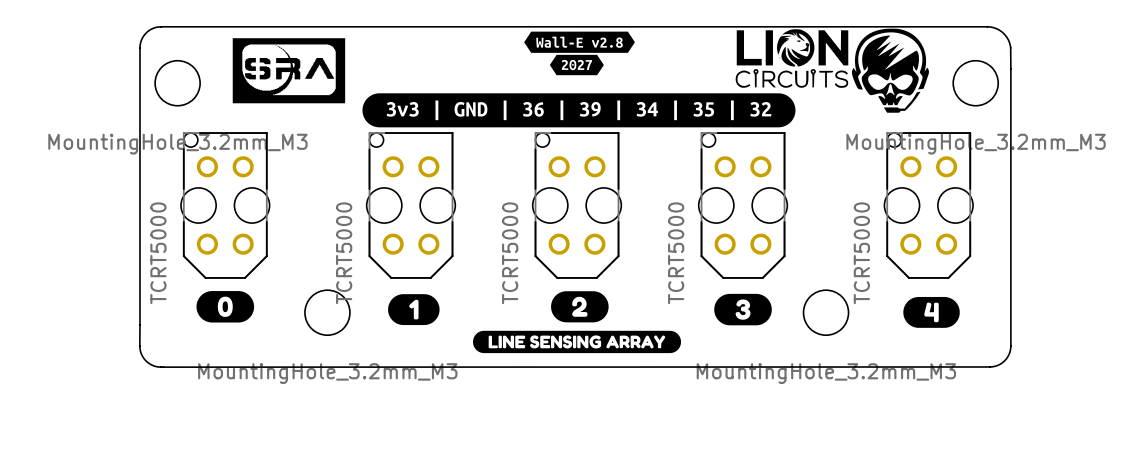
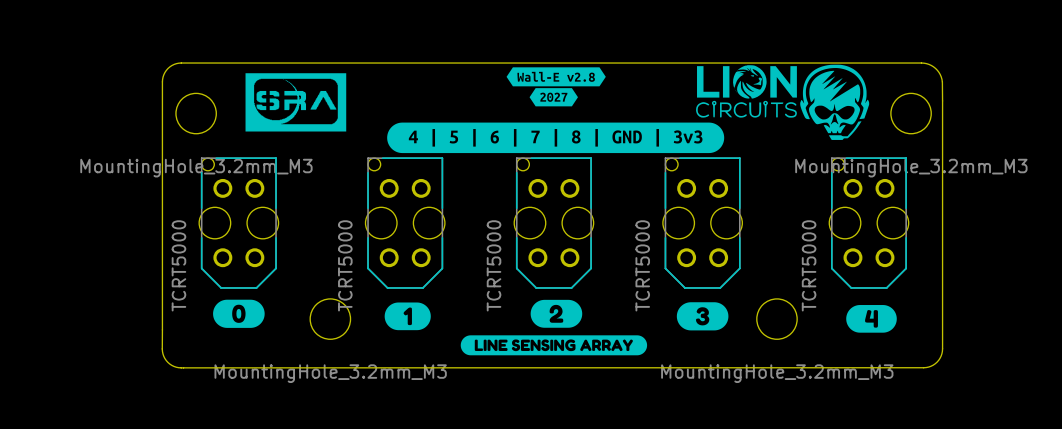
drawing shape: [362, 93, 796, 128] -> [387, 122, 725, 154]

